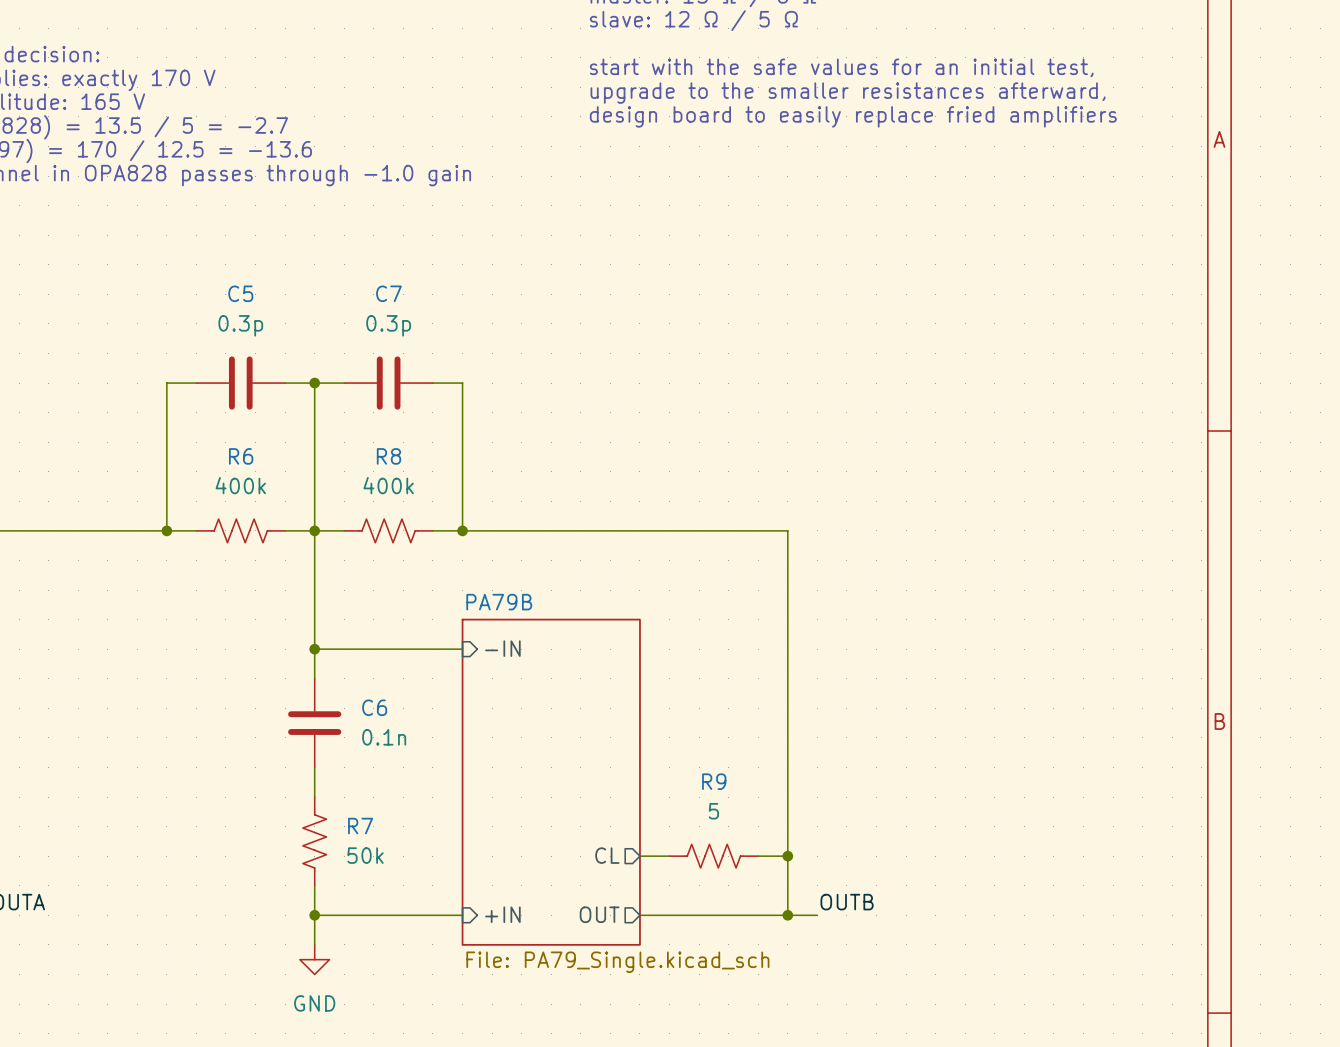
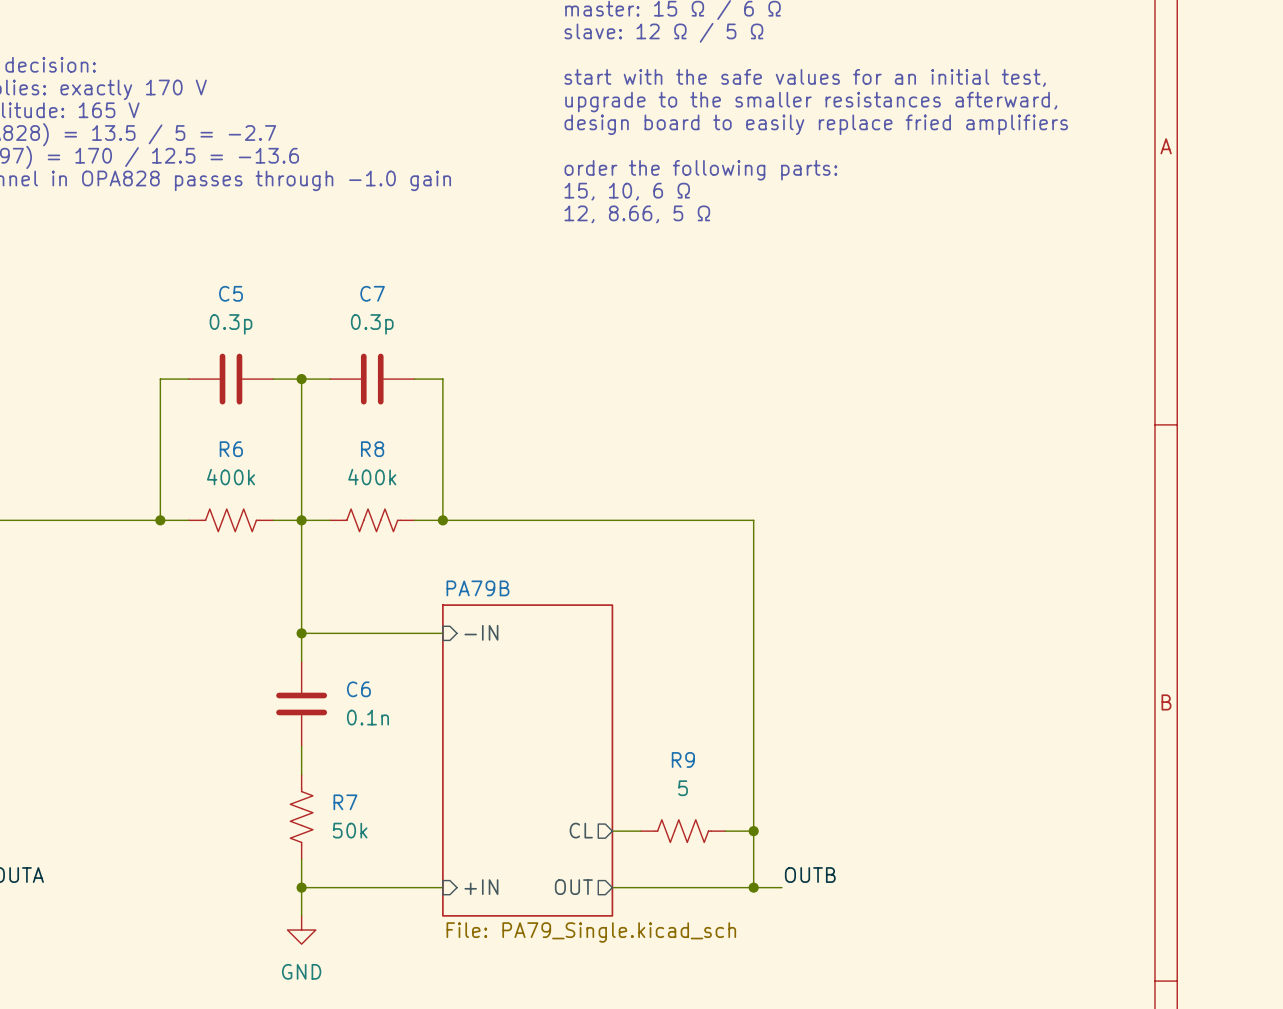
text: none -> order the following parts: (700, 170)
text: none -> 15, 10, 6 Ω (627, 191)
text: none -> 12, 8.66, 5 Ω (637, 214)

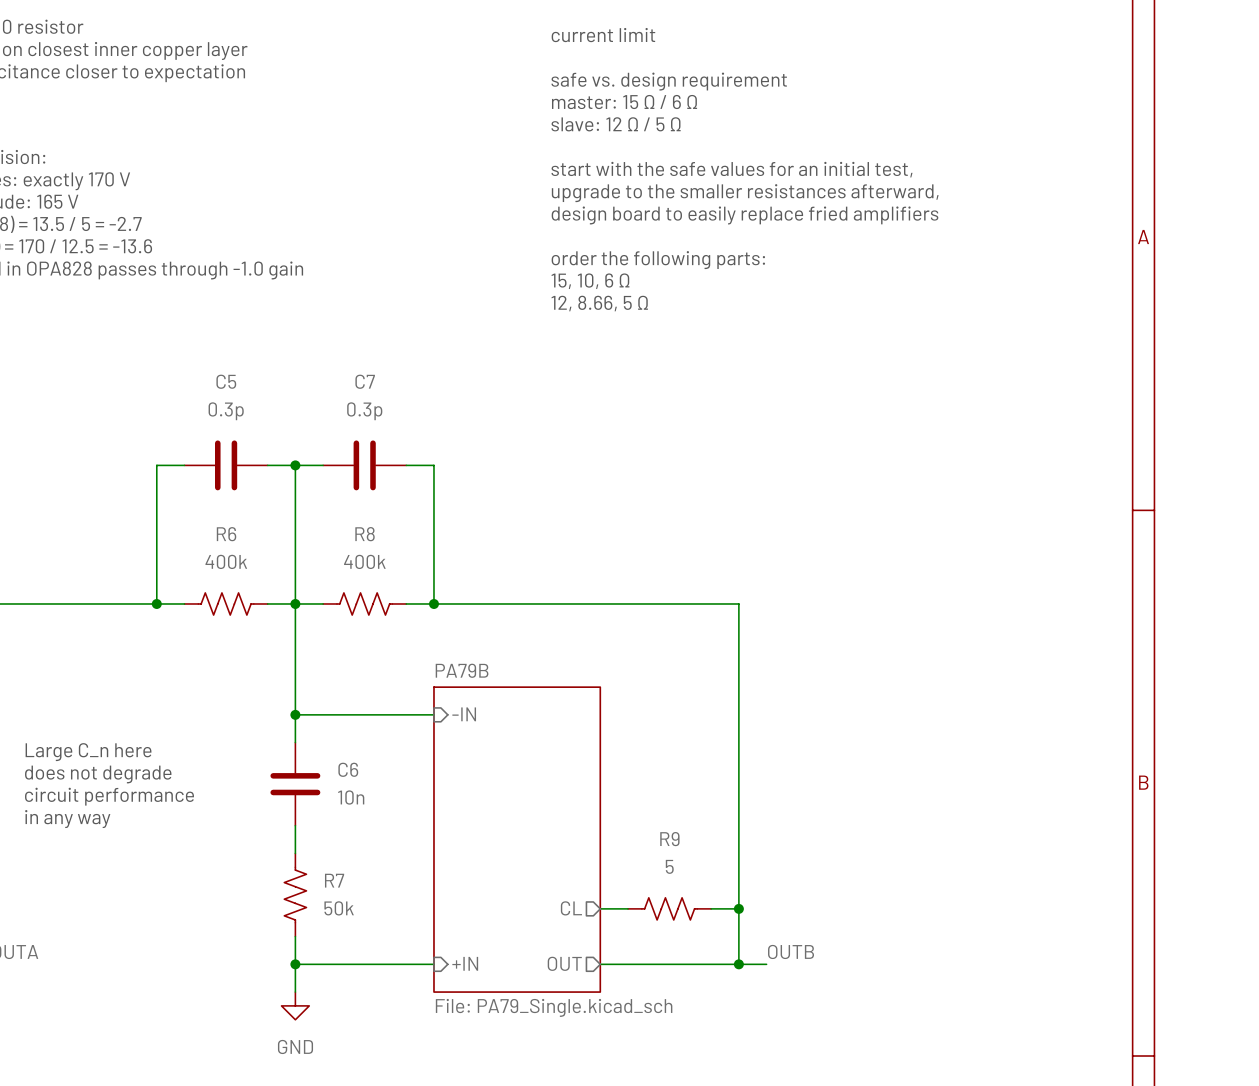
text: none -> Large C_n here (88, 752)
text: none -> does not degrade (98, 774)
text: none -> circuit performance (109, 796)
C6 value: 0.1n (367, 717) -> 10n (351, 797)
text: none -> in any way (67, 819)

